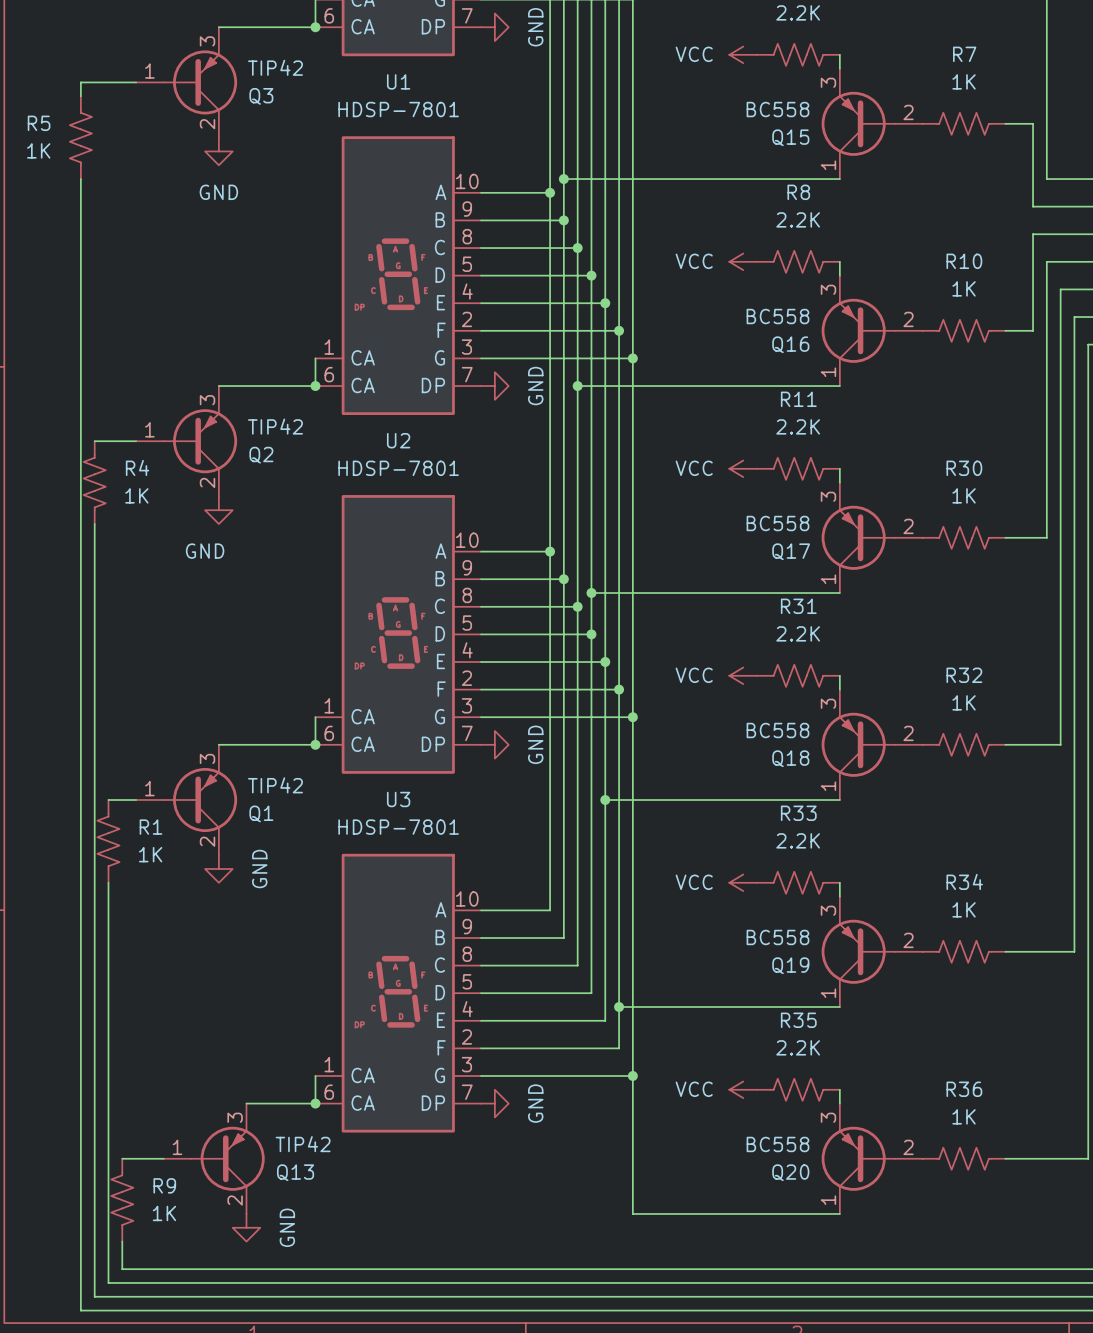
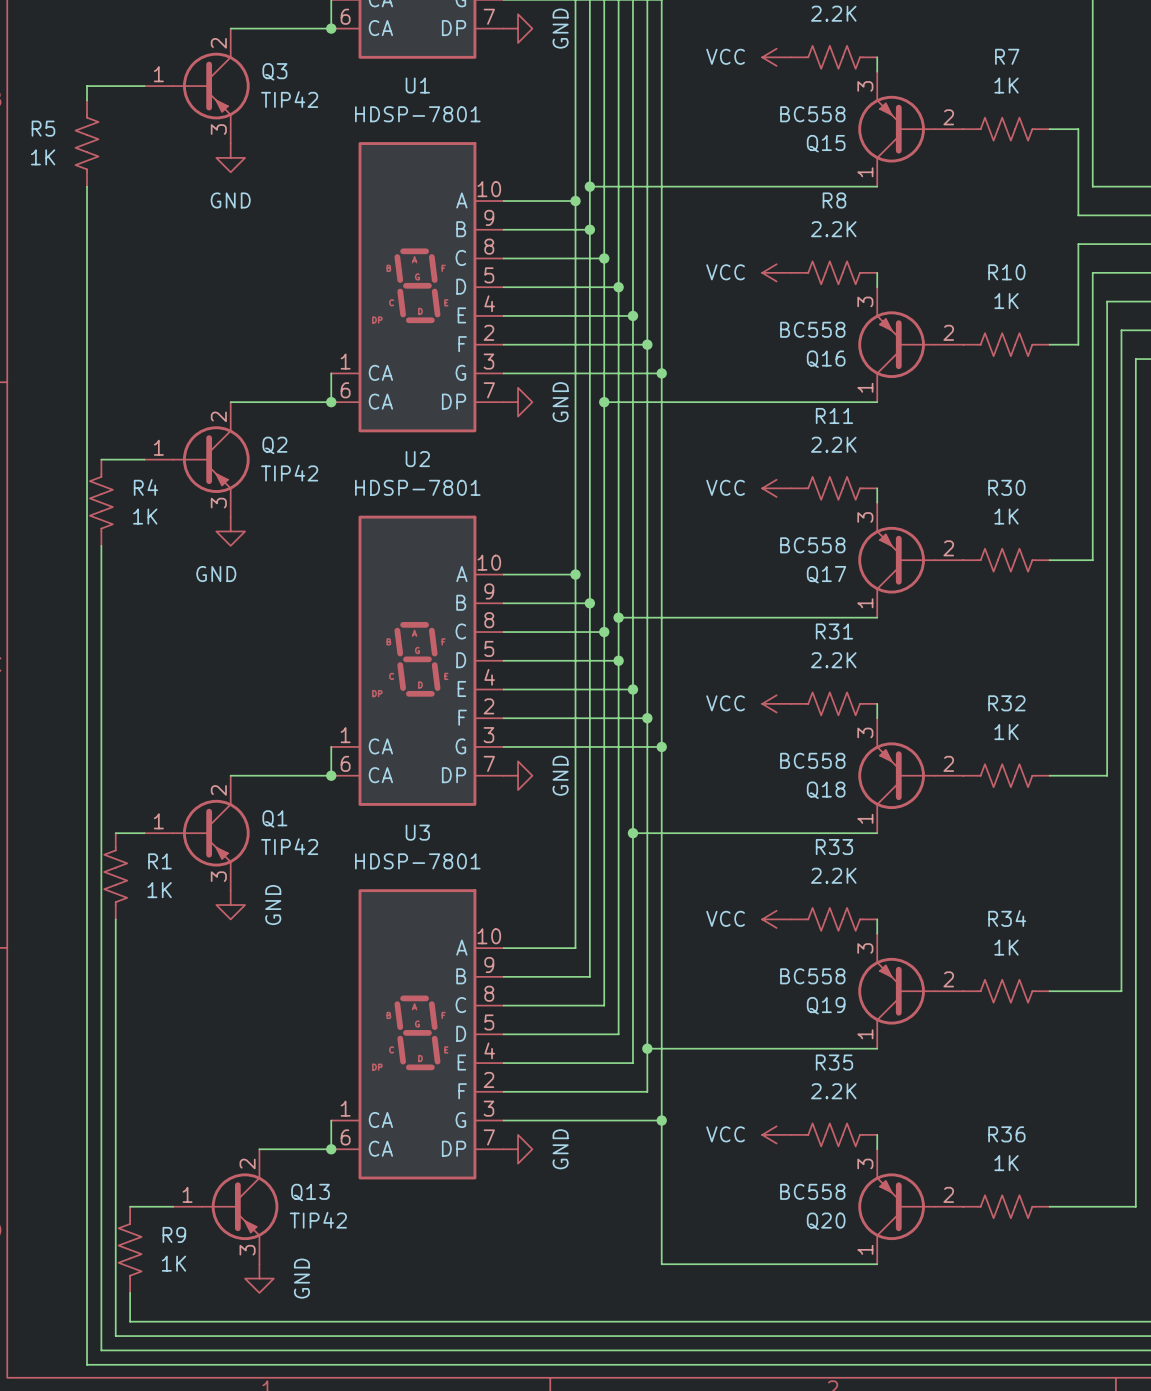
Q3 flip: as is (200, 82) -> up-down (211, 86)
Q2 flip: as is (200, 441) -> up-down (211, 459)
Q1 flip: as is (200, 800) -> up-down (211, 833)
Q13 flip: as is (227, 1158) -> up-down (240, 1206)

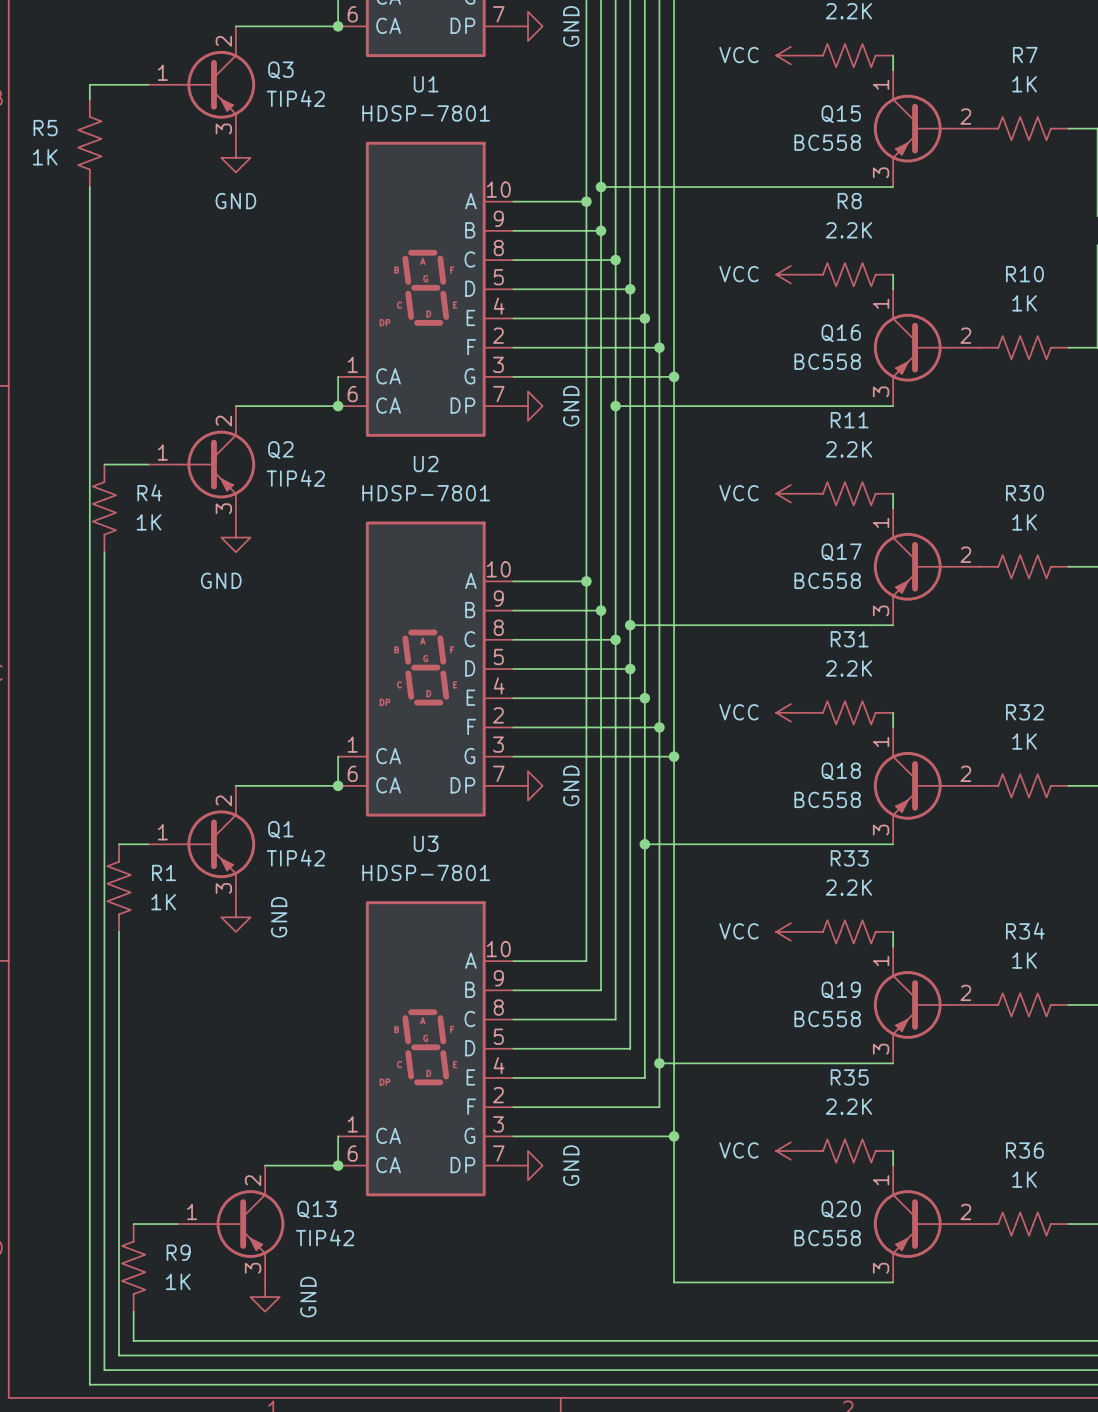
Q15 flip: as is (896, 129) -> up-down (912, 128)
Q16 flip: as is (896, 344) -> up-down (912, 347)
Q17 flip: as is (896, 560) -> up-down (912, 566)
Q18 flip: as is (896, 775) -> up-down (912, 785)
Q19 flip: as is (896, 991) -> up-down (912, 1004)
Q20 flip: as is (896, 1206) -> up-down (912, 1224)

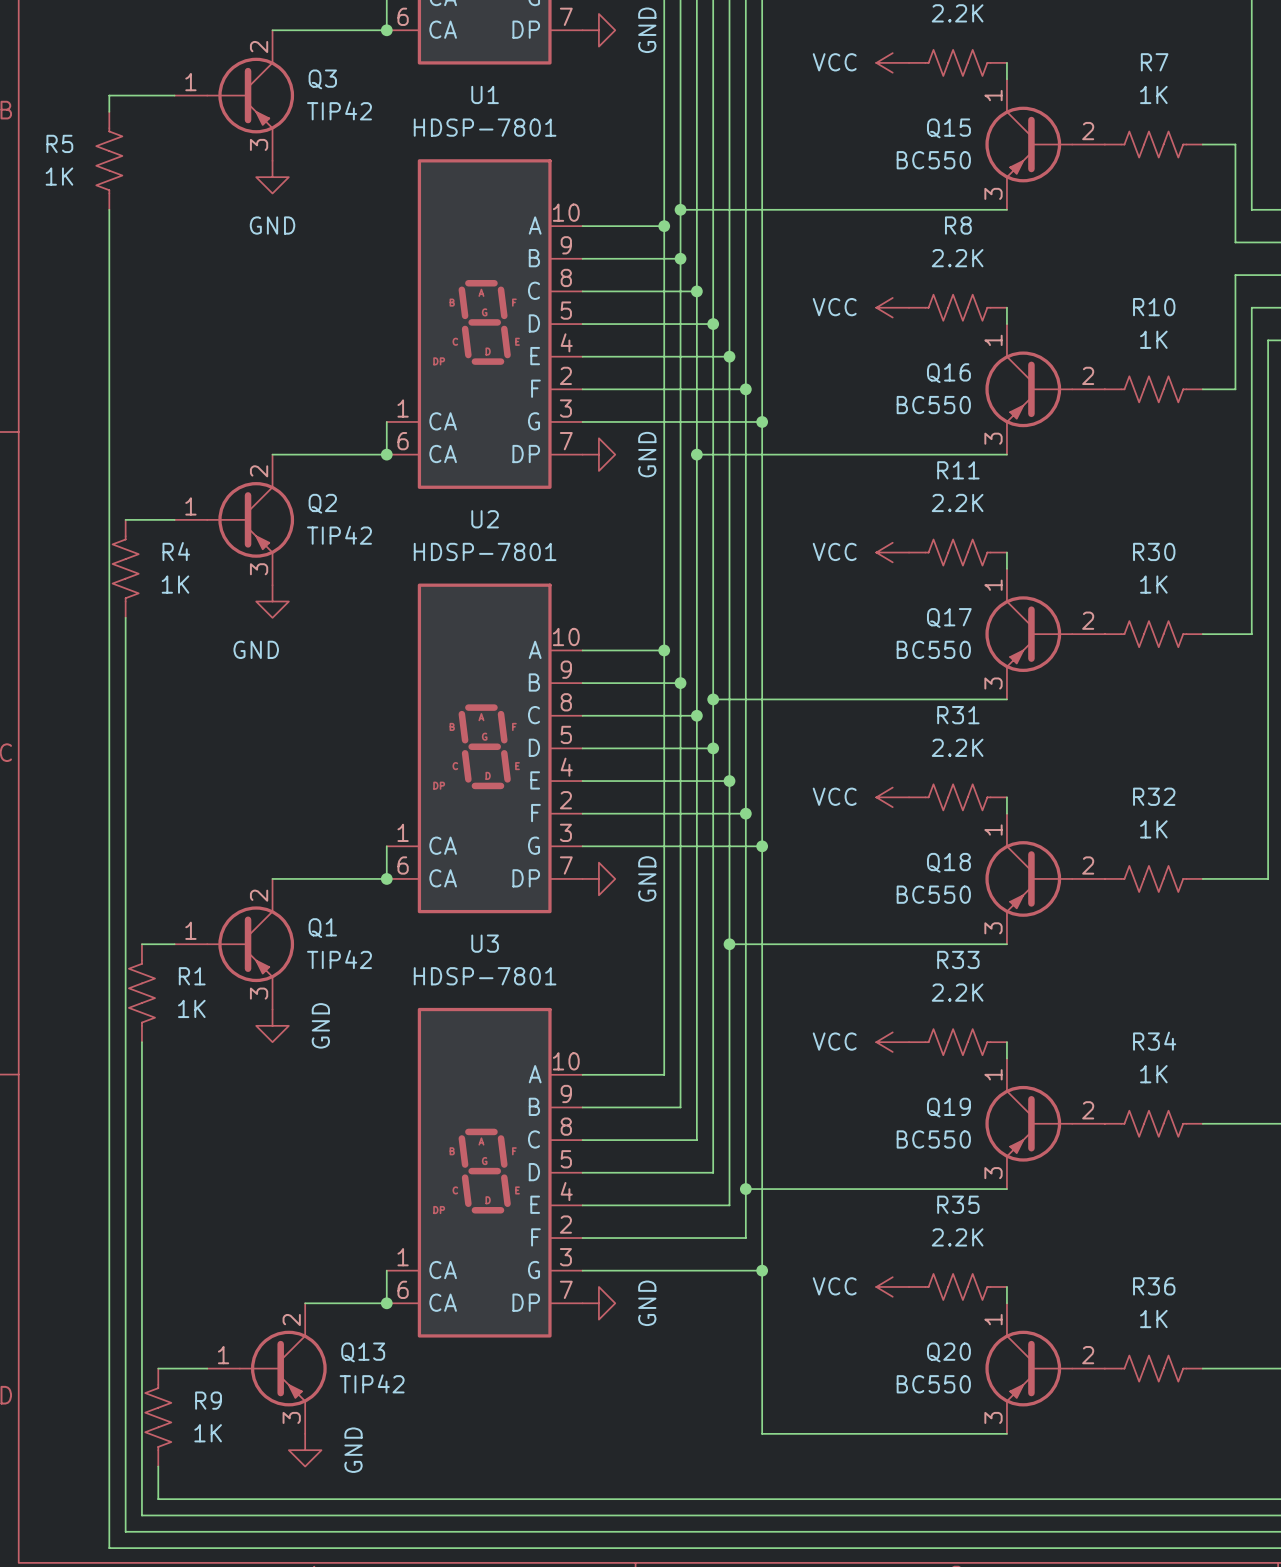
Q15 value: BC558 (827, 142) -> BC550 (933, 160)
Q16 value: BC558 (827, 361) -> BC550 (933, 405)
Q17 value: BC558 (827, 580) -> BC550 (933, 649)
Q18 value: BC558 (827, 799) -> BC550 (933, 894)
Q19 value: BC558 (827, 1019) -> BC550 (933, 1139)
Q20 value: BC558 (827, 1238) -> BC550 (933, 1384)

